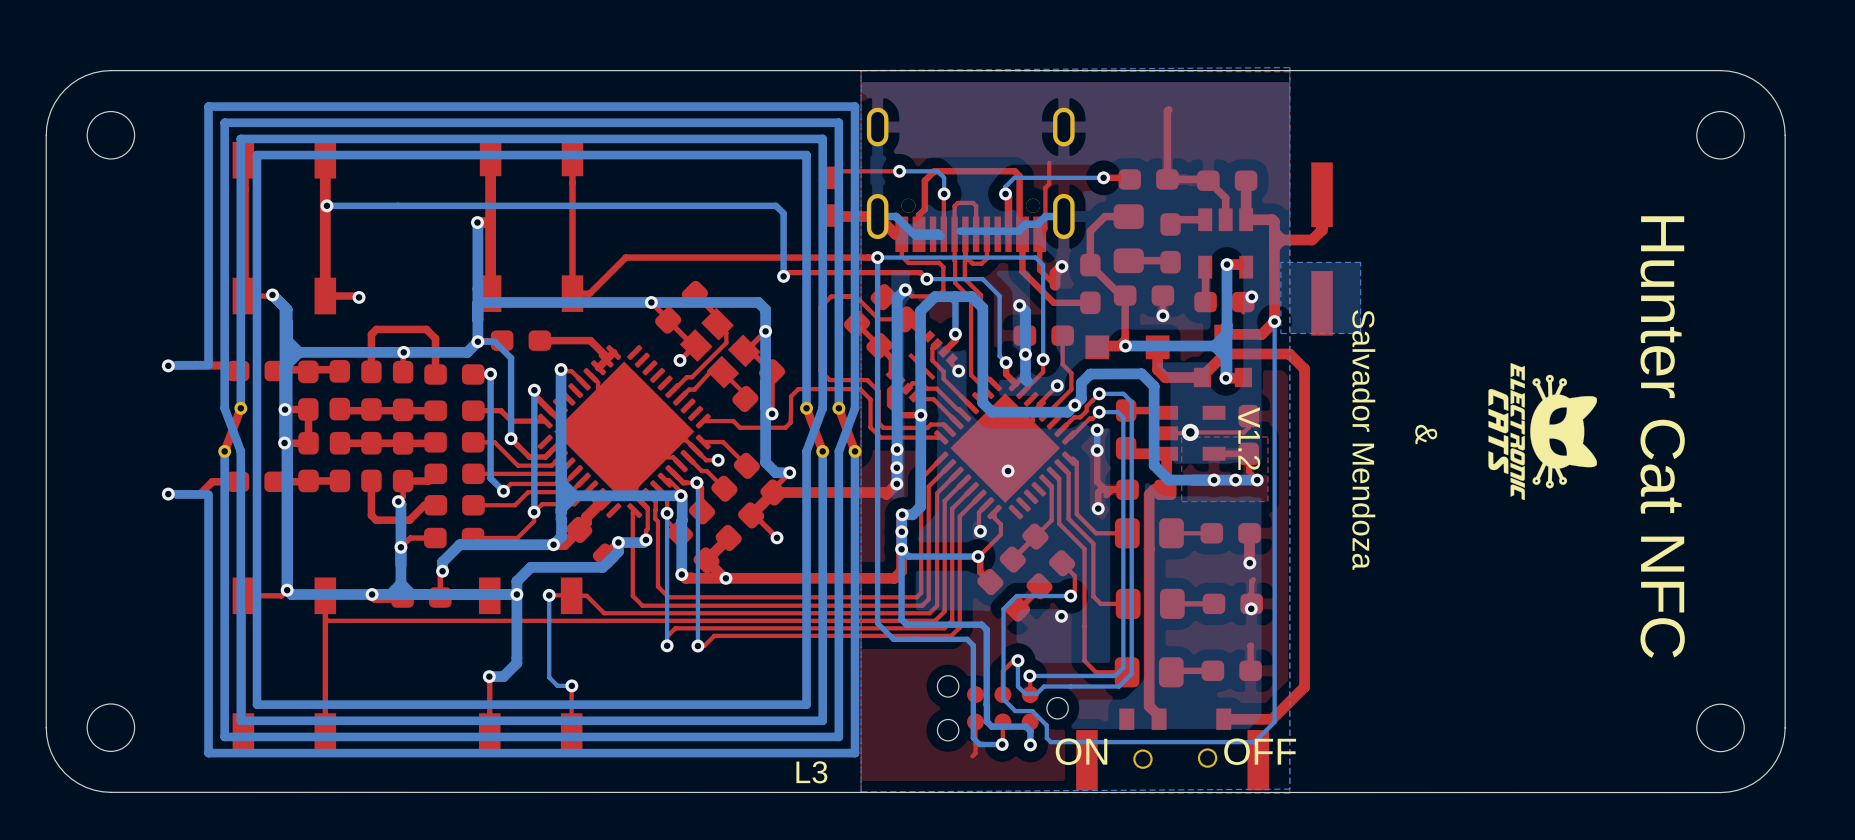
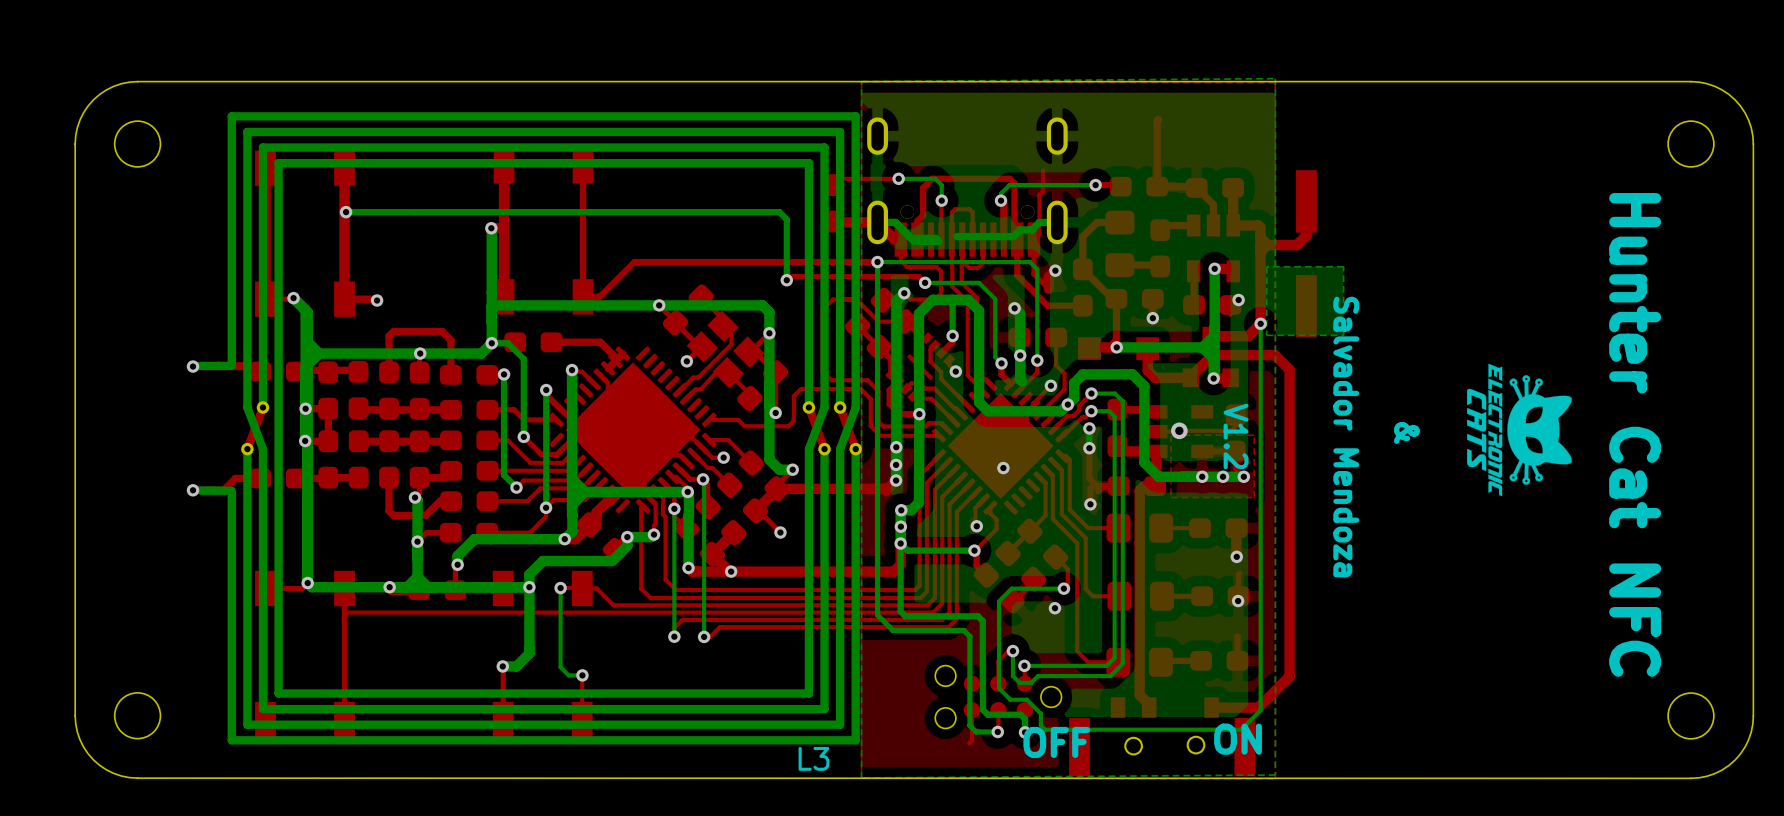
text position: ON (1081, 751) -> ON (1238, 739)
text position: OFF (1260, 751) -> OFF (1056, 742)

